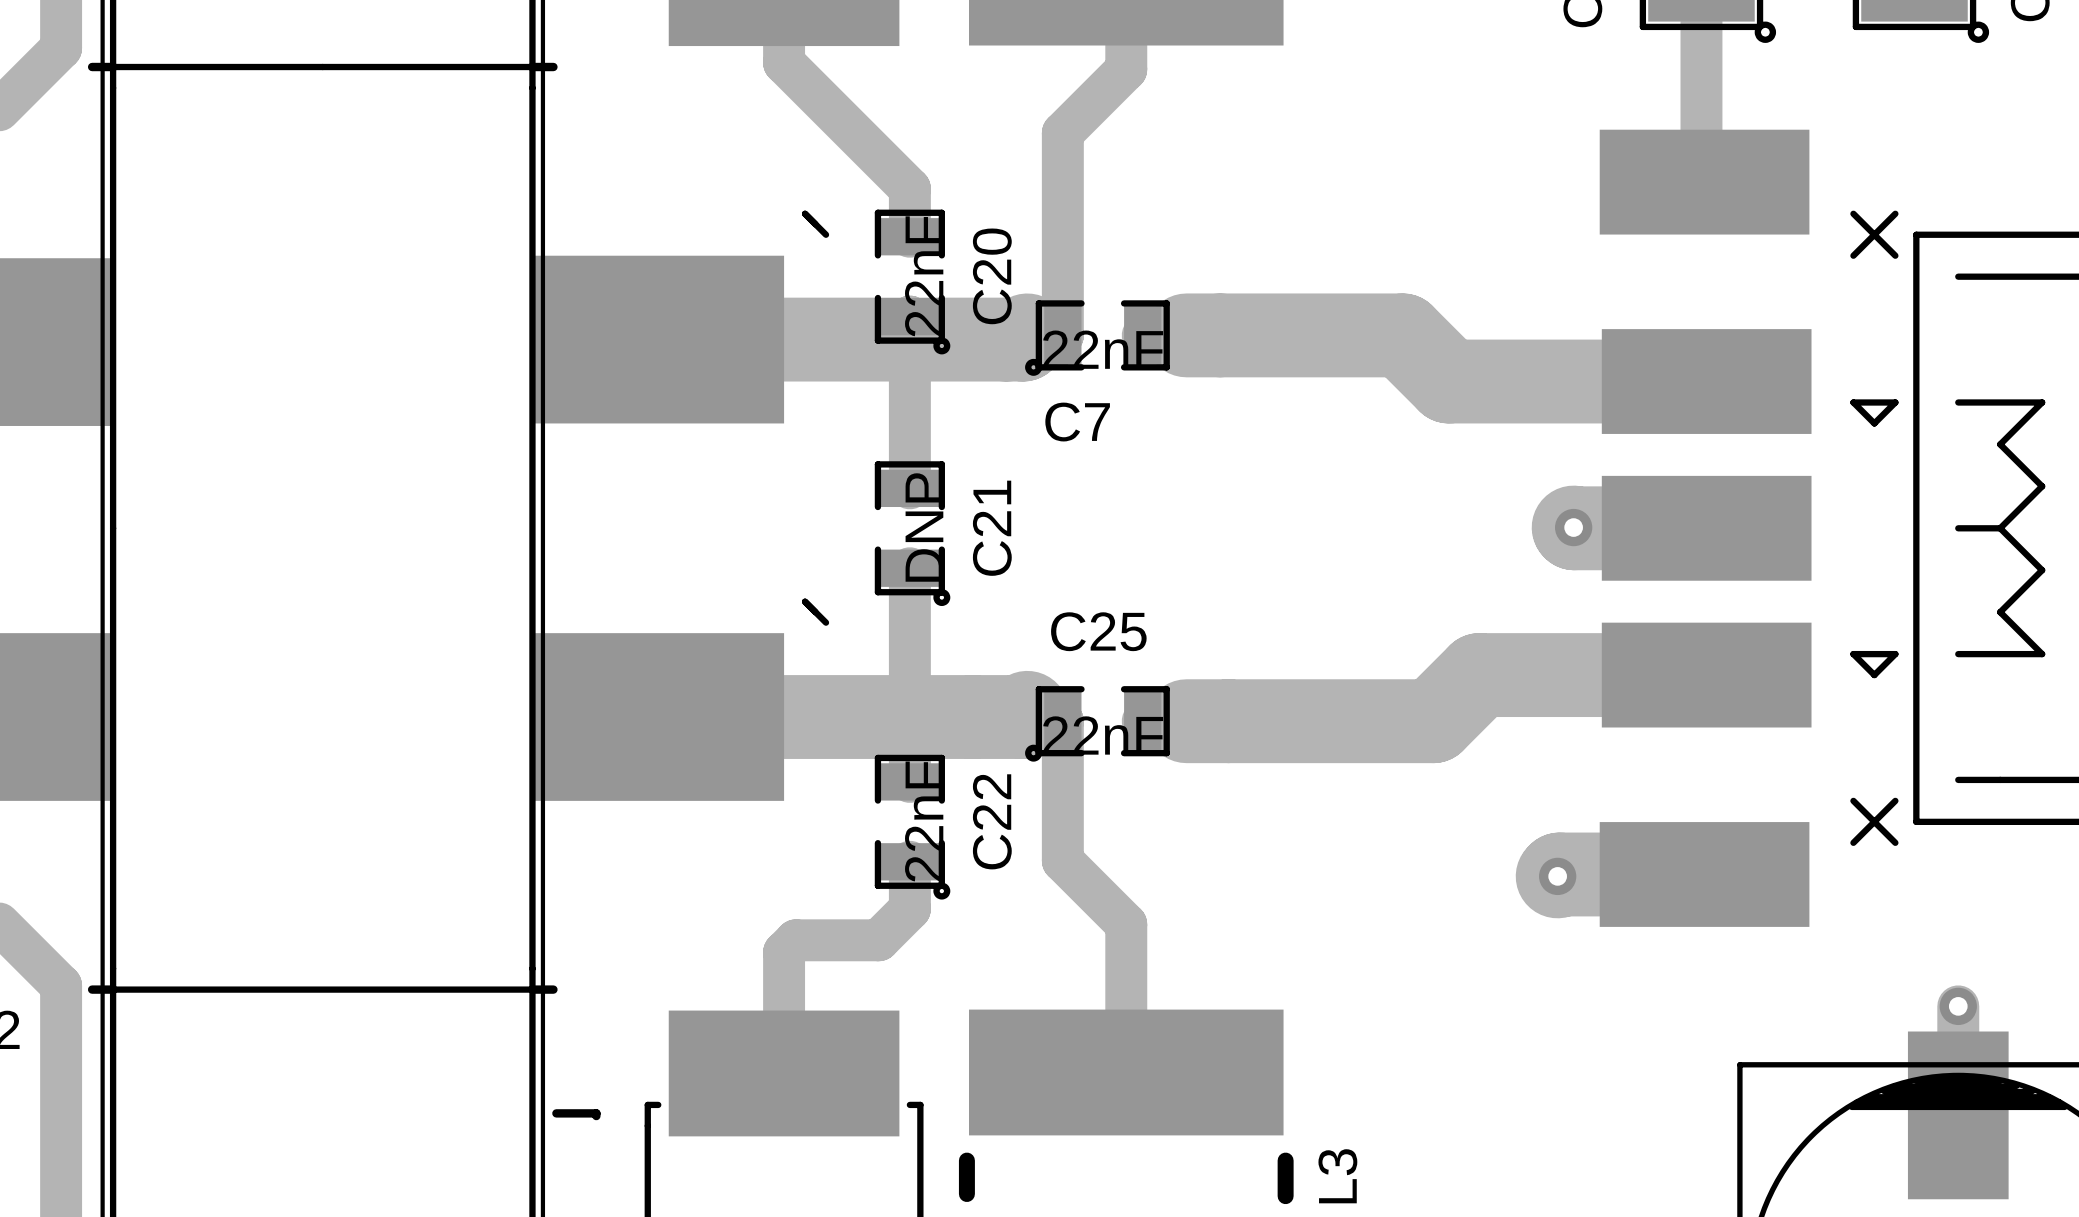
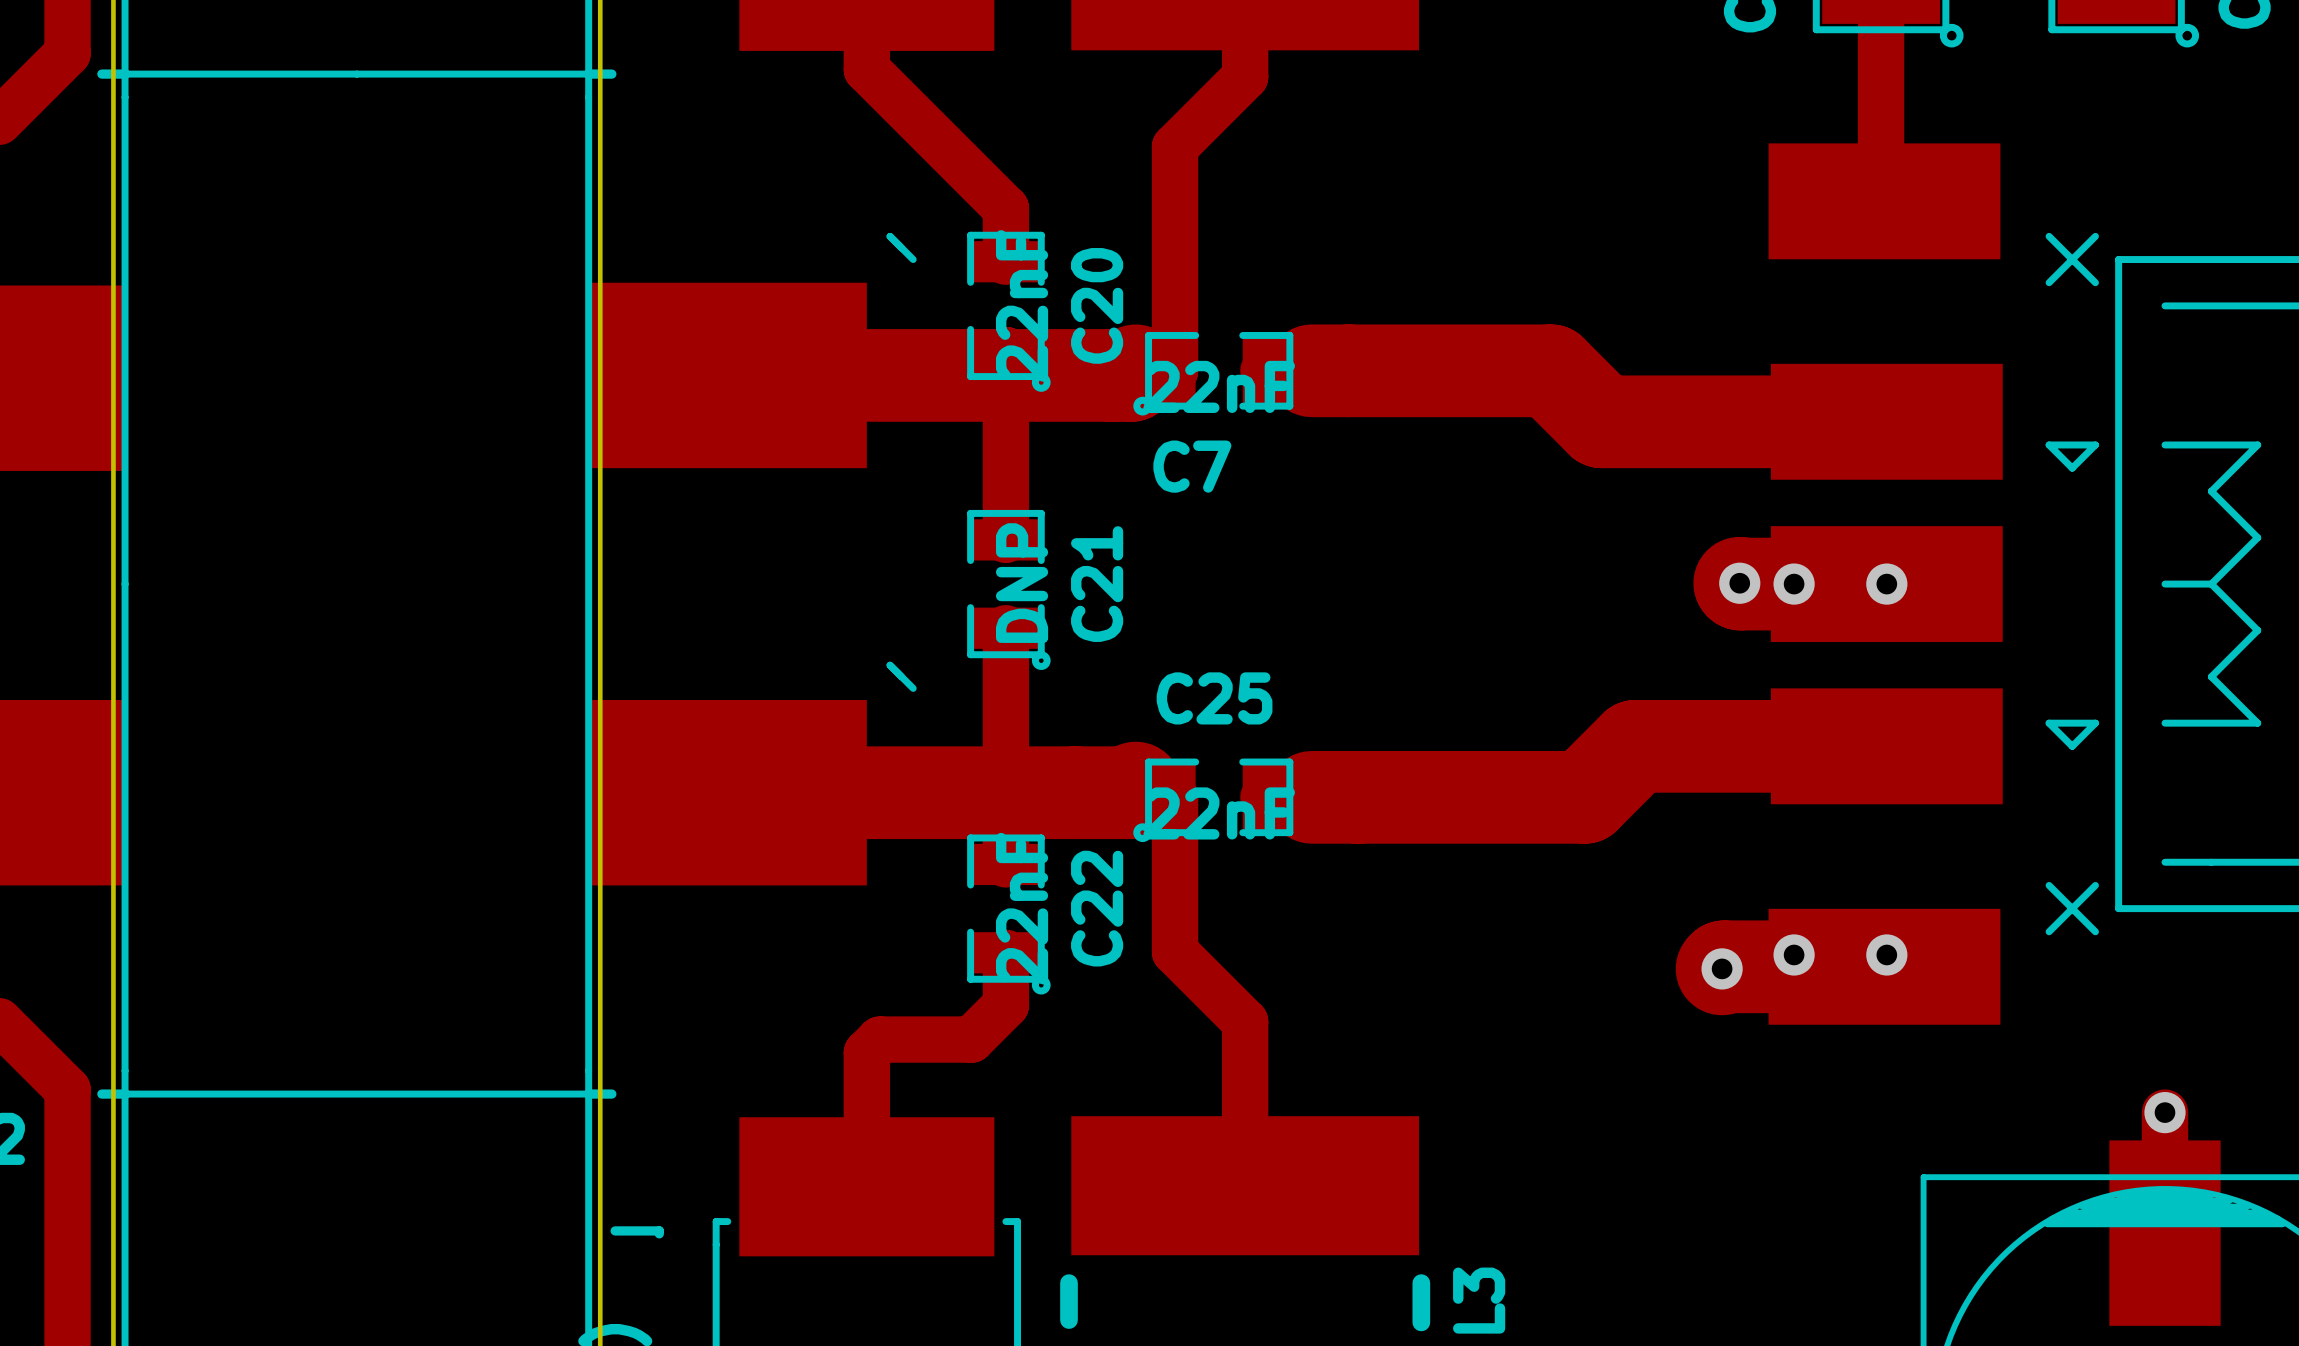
via: none -> (1794, 584)
via: none -> (1886, 584)
via: none -> (1794, 954)
via: none -> (1886, 954)

